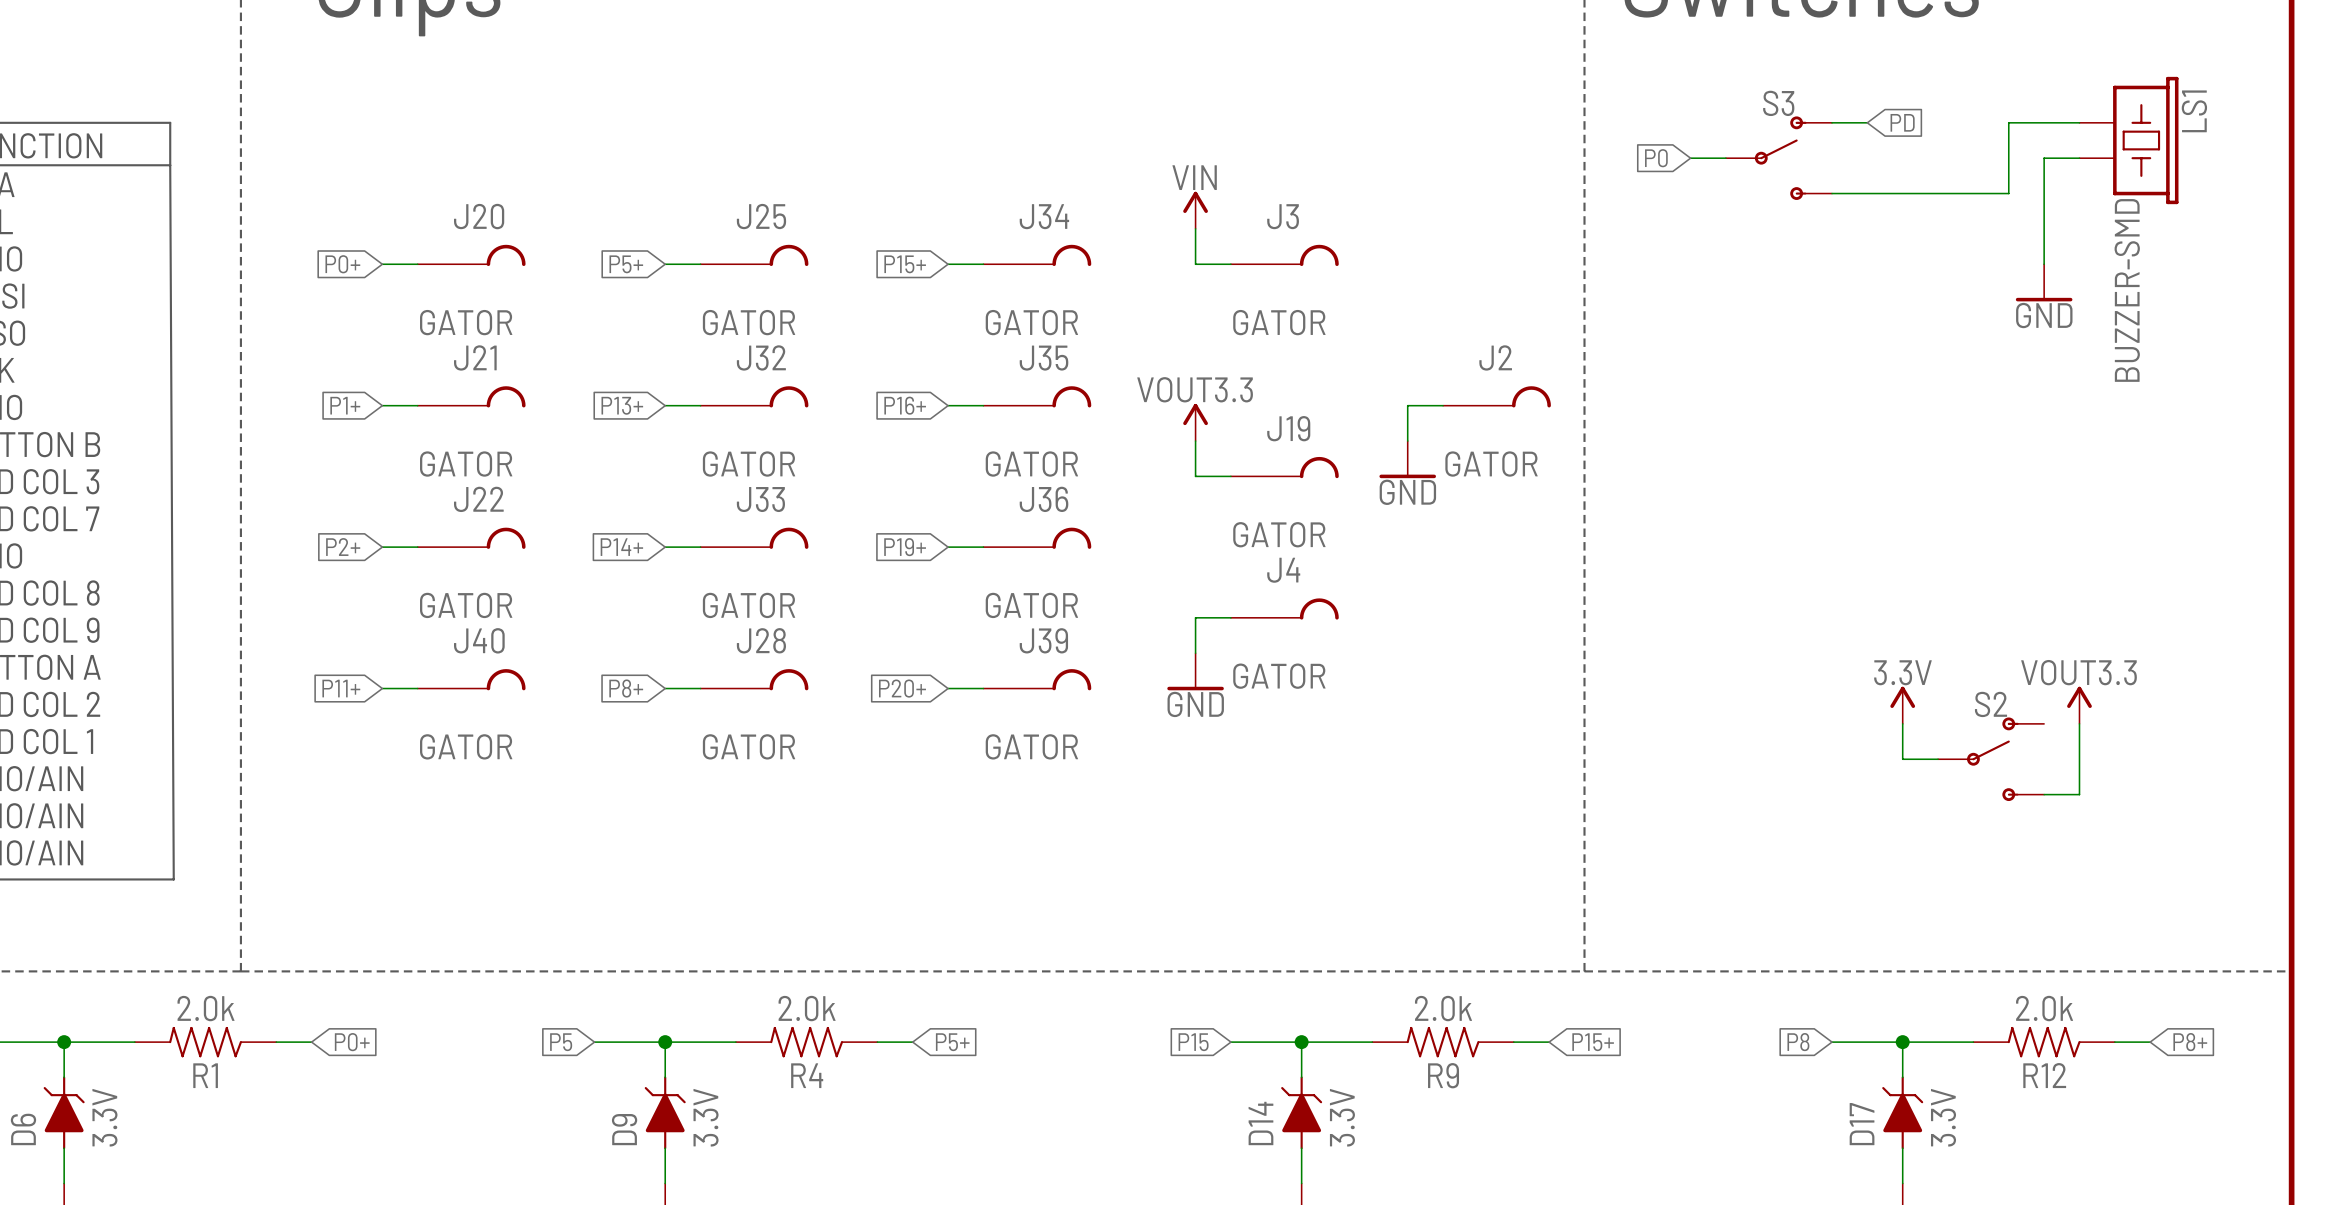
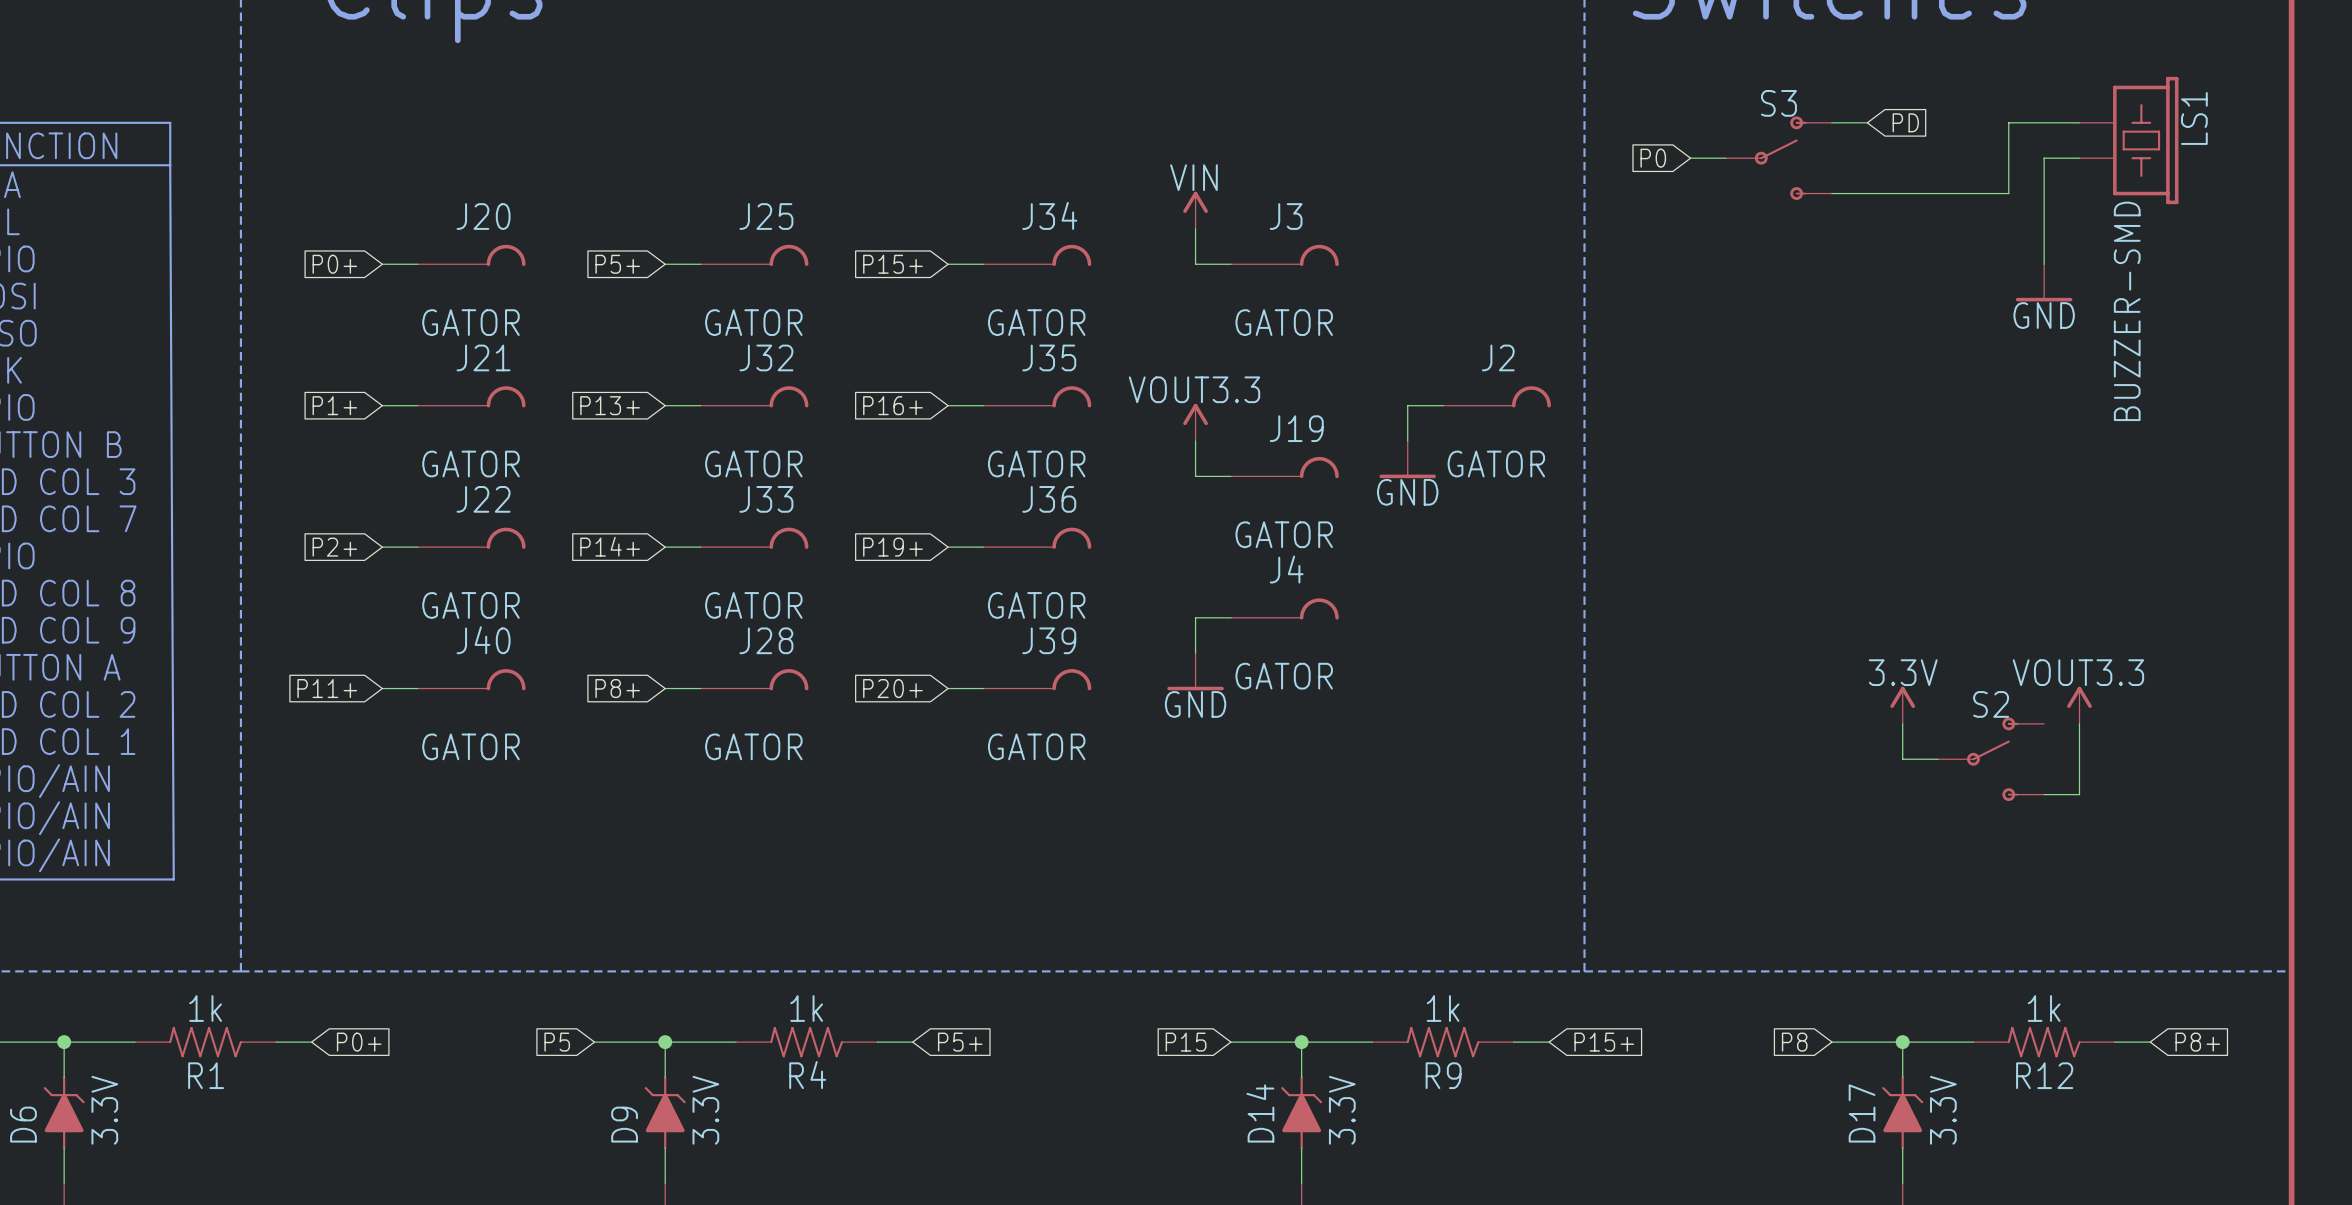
R1 value: 2.0k (206, 1008) -> 1k (205, 1008)
R4 value: 2.0k (807, 1008) -> 1k (806, 1008)
R9 value: 2.0k (1443, 1008) -> 1k (1443, 1008)
R12 value: 2.0k (2044, 1008) -> 1k (2044, 1008)

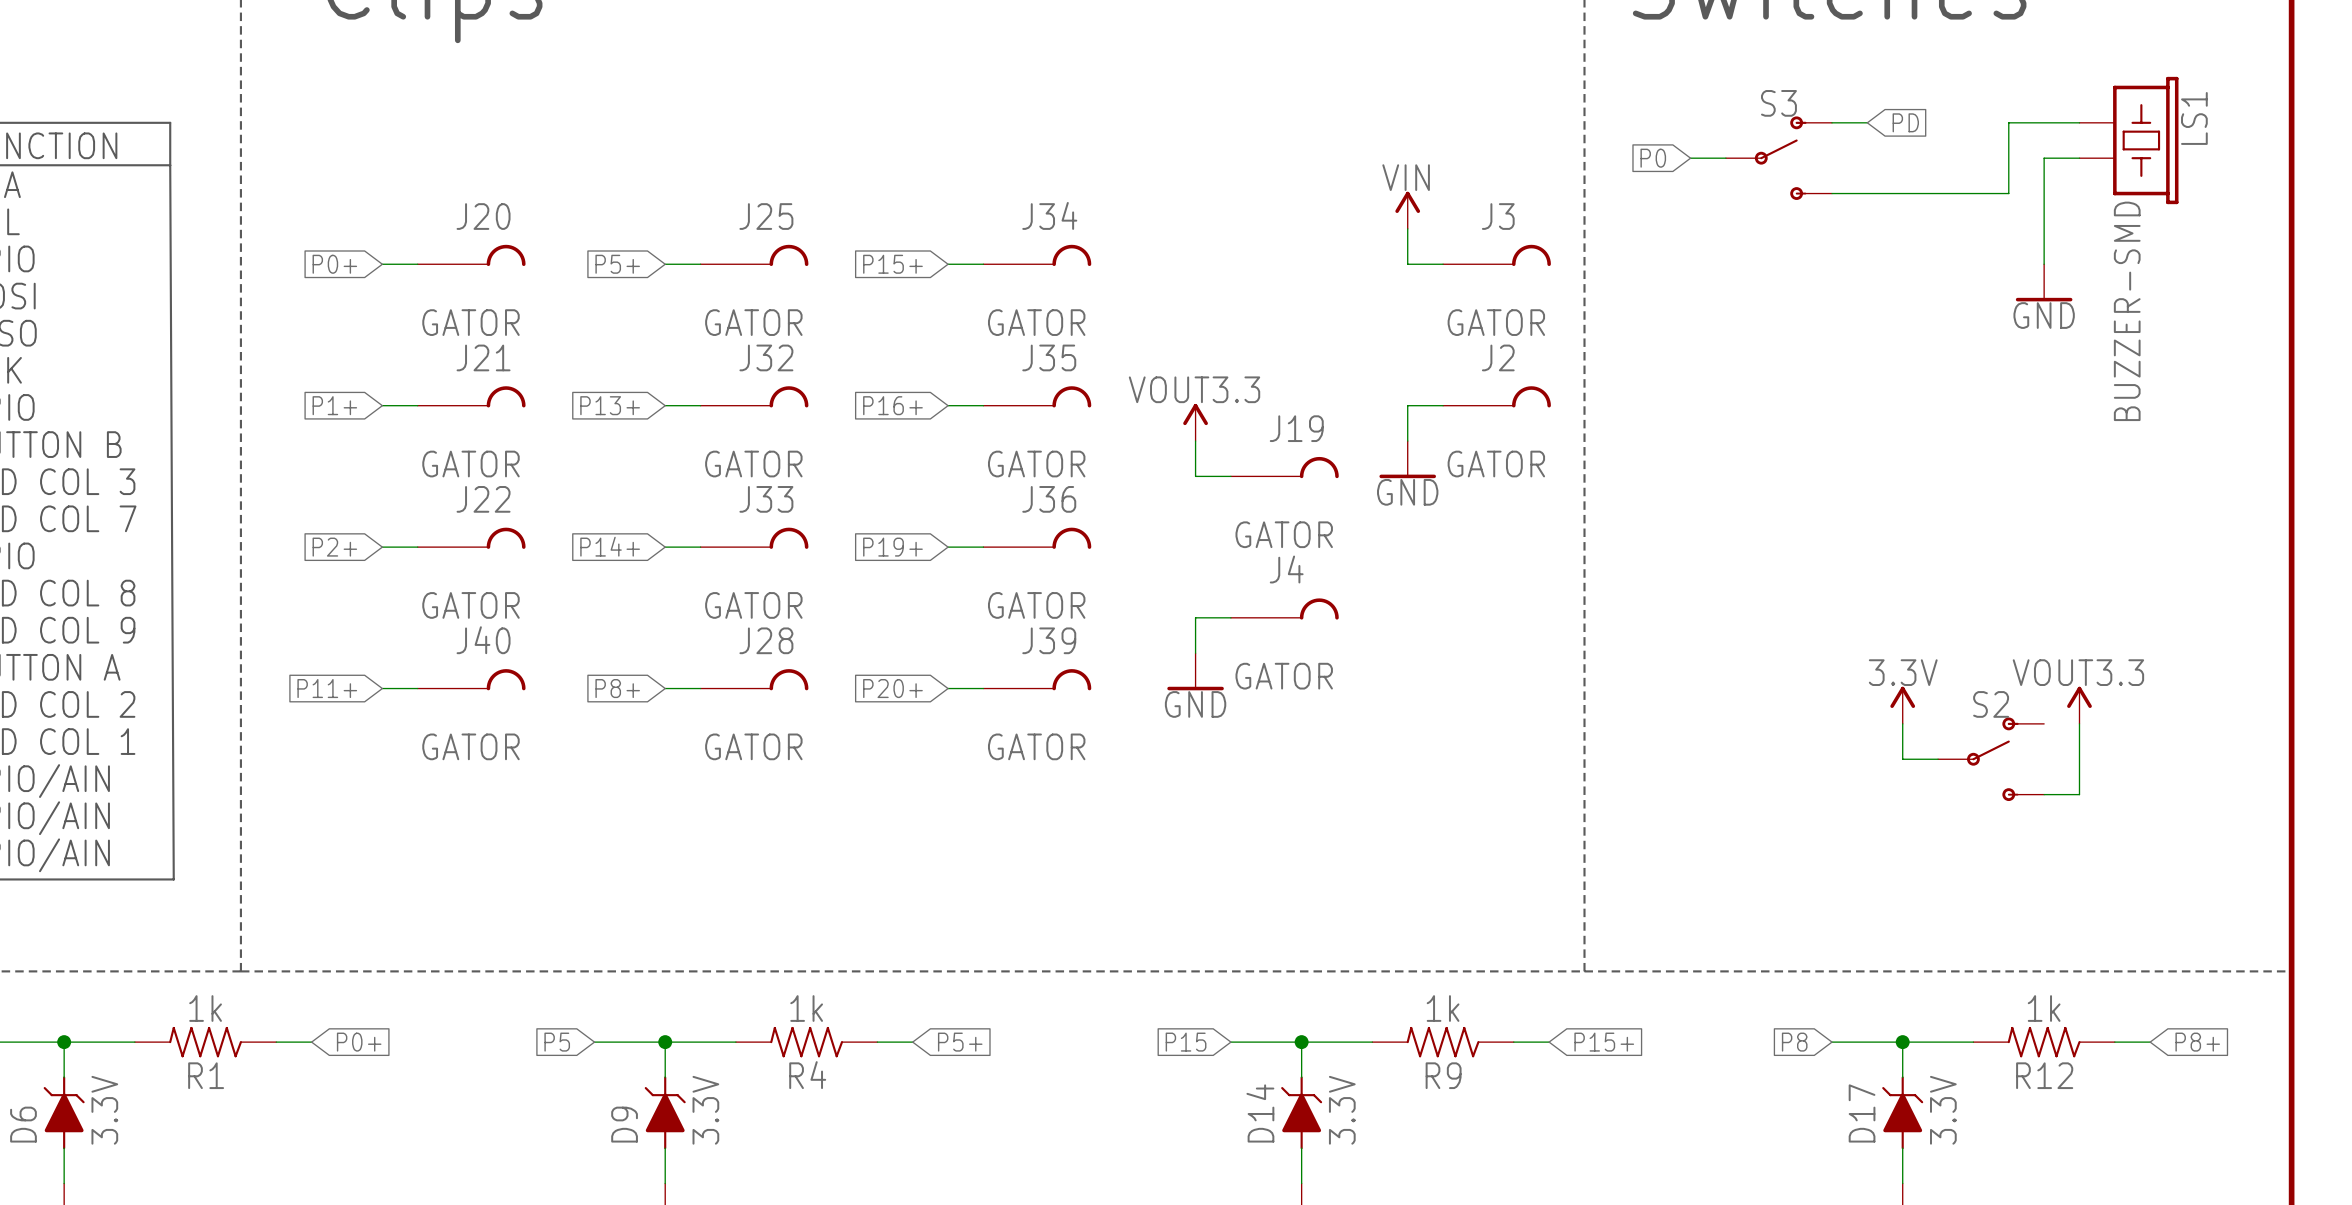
power symbol position: VIN (1195, 210) -> VIN (1407, 210)
wire: (1195, 228) (1195, 264) (1230, 264) -> (1407, 228) (1407, 264) (1443, 264)
J3 position: (1284, 255) -> (1496, 255)

